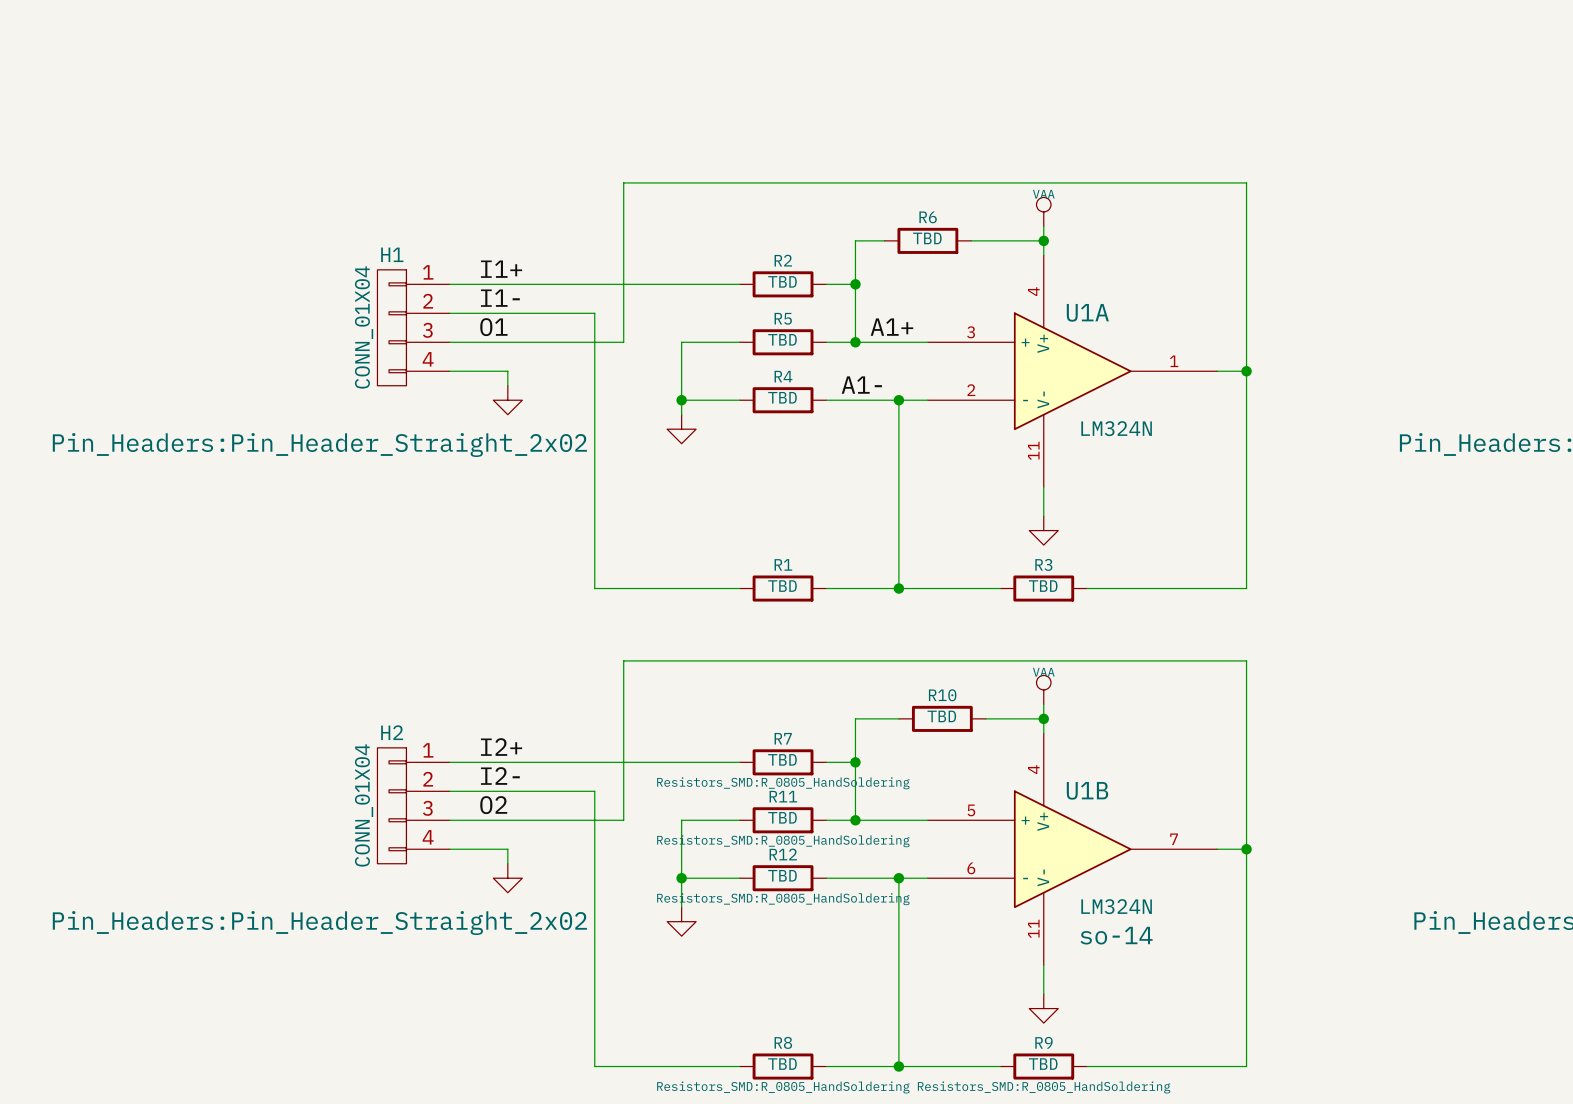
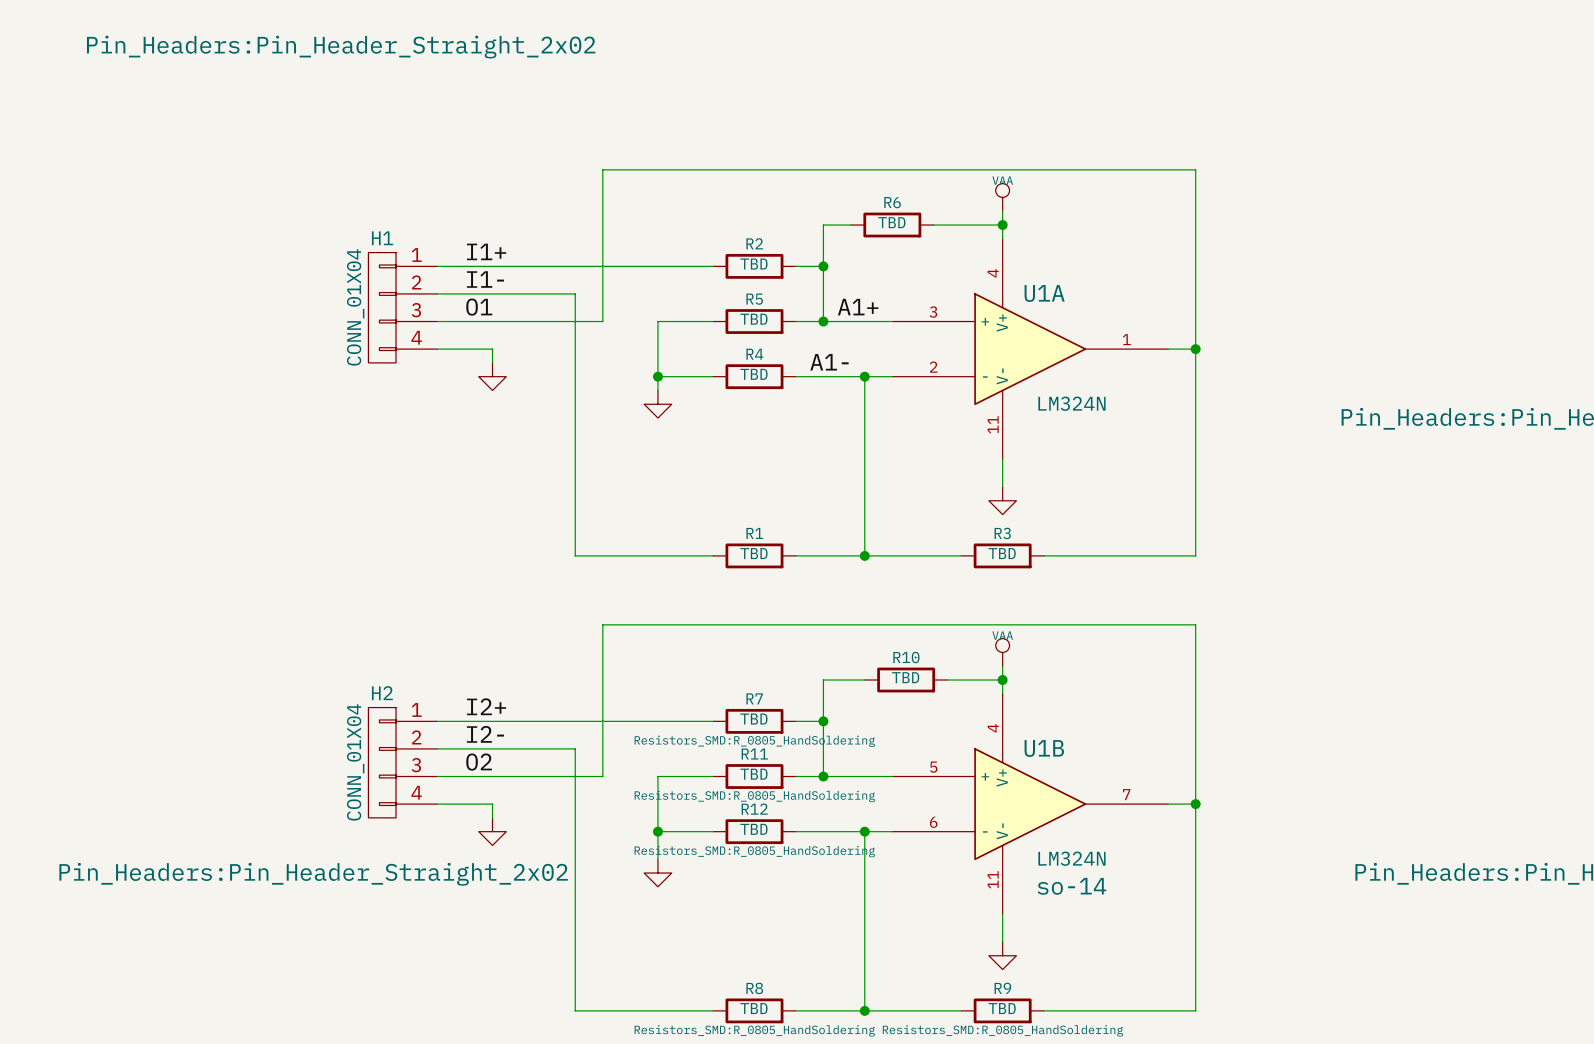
H1 text position: Pin_Headers:Pin_Header_Straight_2x02 (319, 445) -> Pin_Headers:Pin_Header_Straight_2x02 (341, 47)

